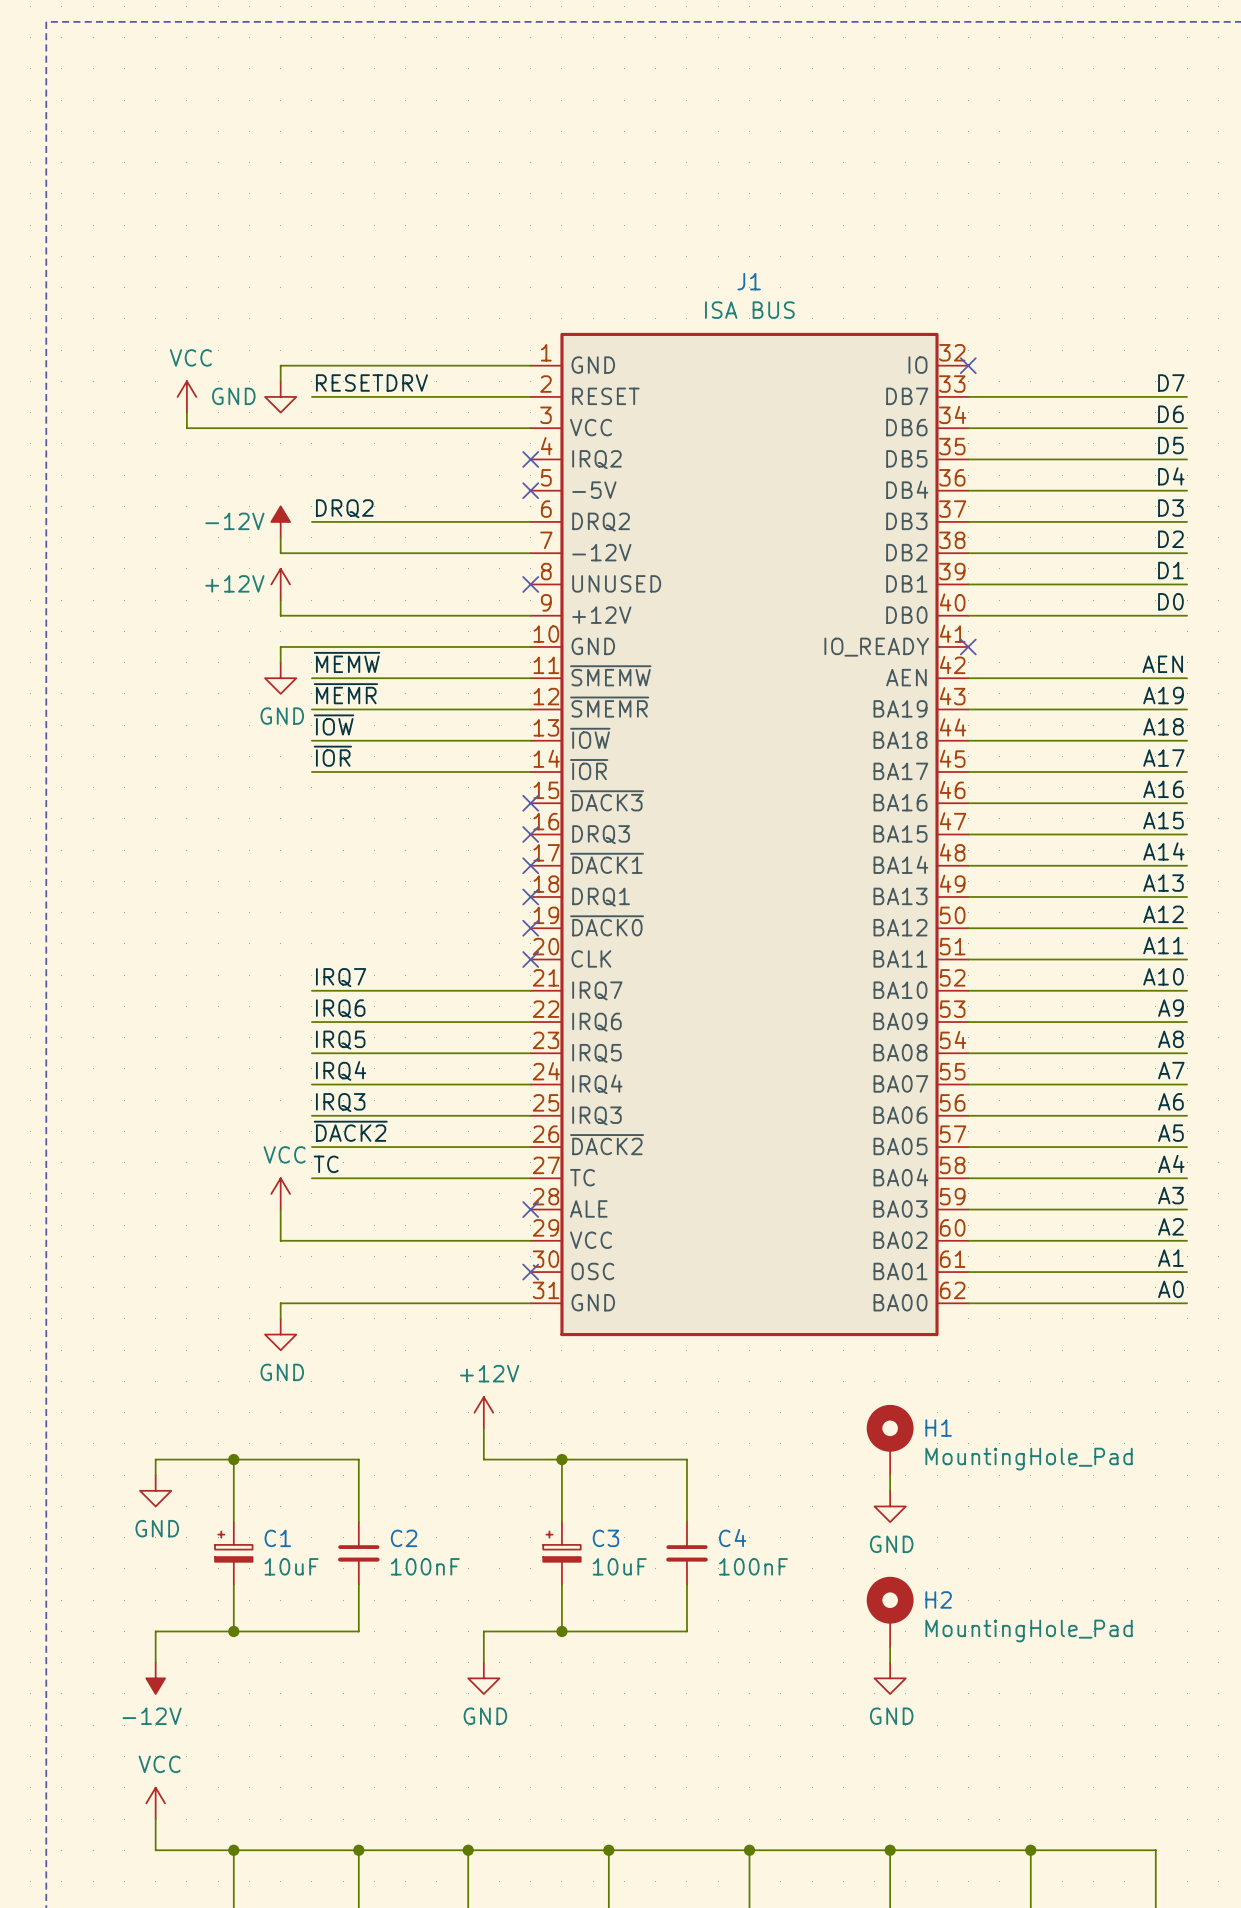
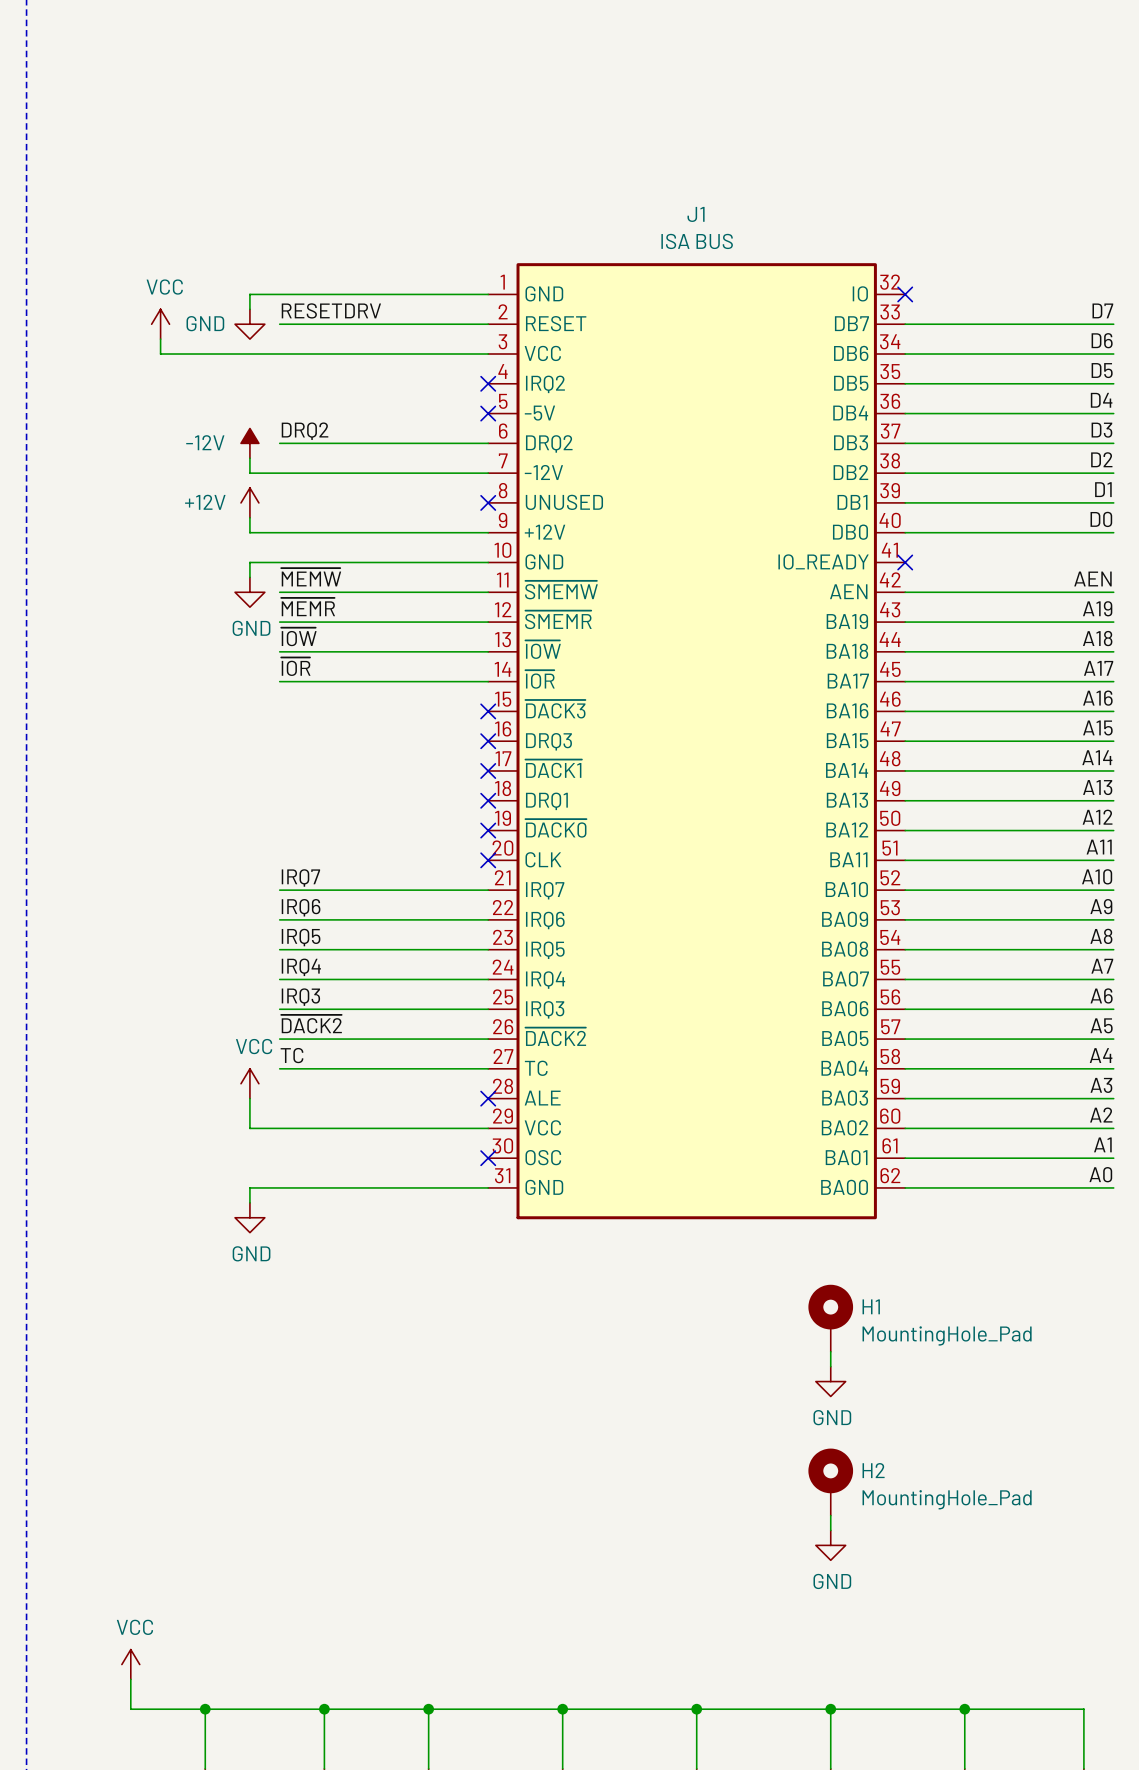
power symbol: +12V (483, 1412) -> none
wire: (483, 1428) (483, 1459) (686, 1459) (686, 1522) -> none
wire: (233, 1459) (233, 1522) -> none
junction: (233, 1459) -> none
wire: (561, 1459) (561, 1522) -> none
junction: (561, 1459) -> none
wire: (155, 1475) (155, 1459) (358, 1459) (358, 1522) -> none
power symbol: GND (155, 1490) -> none
C1: 10uF (233, 1553) -> none
C2: 100nF (358, 1553) -> none
C3: 10uF (561, 1553) -> none
C4: 100nF (686, 1553) -> none
wire: (233, 1584) (233, 1631) -> none
wire: (358, 1584) (358, 1631) (155, 1631) (155, 1662) -> none
wire: (561, 1584) (561, 1631) -> none
wire: (686, 1584) (686, 1631) (483, 1631) (483, 1662) -> none
junction: (233, 1631) -> none
junction: (561, 1631) -> none
power symbol: -12V (155, 1678) -> none
power symbol: GND (483, 1678) -> none

